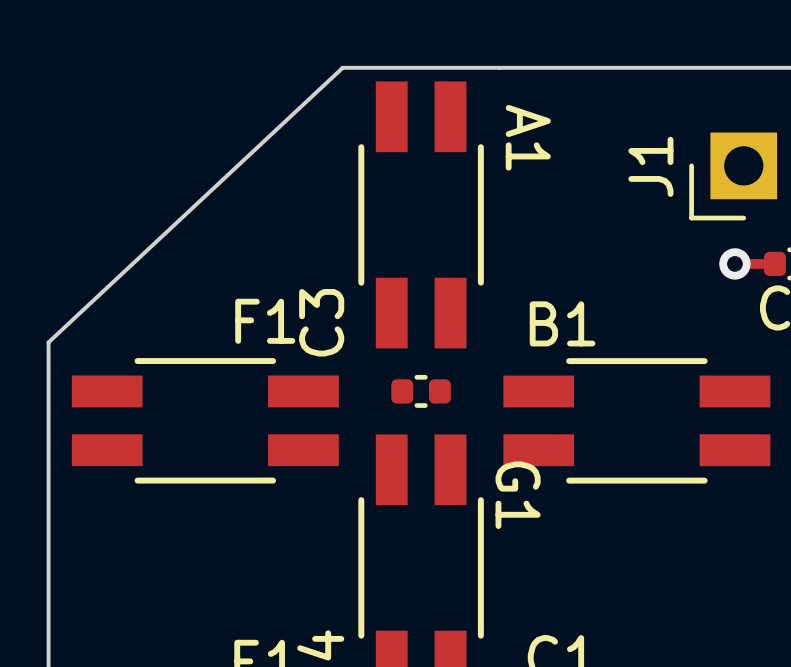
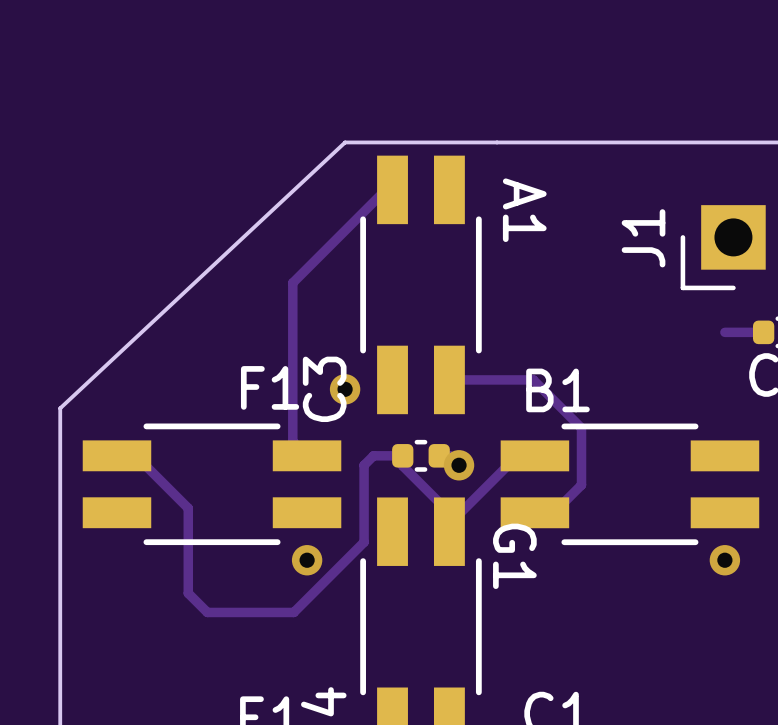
track: none -> (392, 189) (385, 189) (292, 282) (292, 441) (307, 455)
via: (734, 263) -> none
track: none -> (449, 379) (533, 379) (581, 428) (581, 485) (553, 512) (534, 512)
via: none -> (345, 389)
track: none -> (116, 455) (135, 455) (188, 508) (188, 593) (207, 612) (293, 612) (364, 542) (364, 465) (373, 455) (402, 455) (402, 465) (449, 512) (449, 531)
track: none -> (534, 455) (517, 455) (449, 523)
via: none -> (459, 465)
via: none -> (307, 560)
via: none -> (724, 560)

